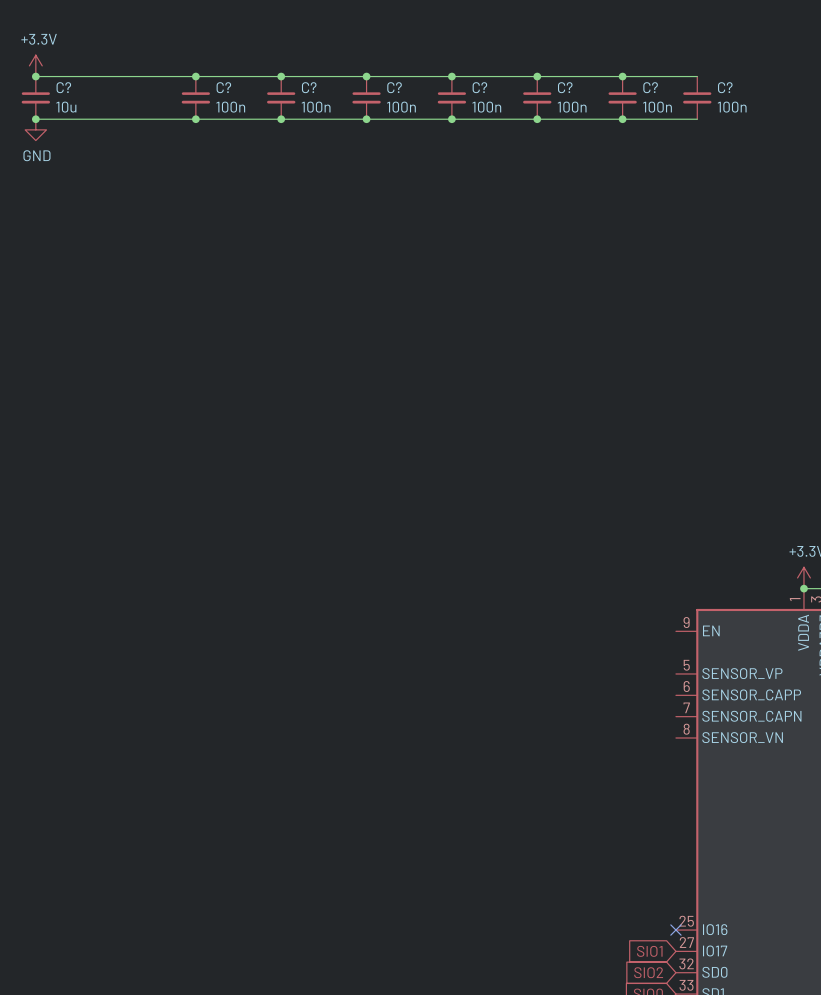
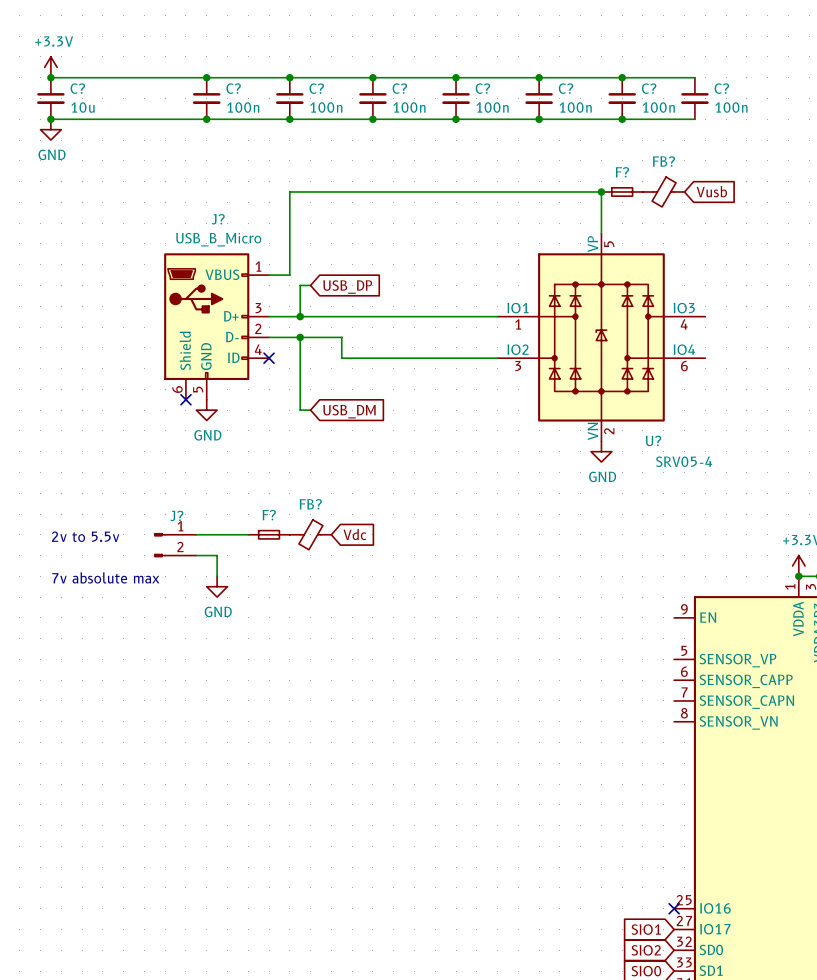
junction: none -> (601, 191)
F?: none -> (622, 191)
FB?: none -> (663, 191)
global label: none -> Vusb (711, 191)
wire: none -> (601, 233) (601, 191) (289, 191) (289, 275) (269, 275)
wire: none -> (310, 285) (300, 285) (300, 316)
global label: none -> USB_DP (347, 287)
wire: none -> (269, 316) (497, 316)
junction: none -> (300, 316)
J?: none -> USB_B_Micro (216, 326)
wire: none -> (269, 337) (341, 337) (341, 358) (497, 358)
wire: none -> (300, 337) (300, 410) (310, 410)
junction: none -> (300, 337)
U?: none -> SRV05-4 (601, 337)
no-connect mark: none -> (269, 358)
no-connect mark: none -> (185, 399)
power symbol: none -> GND (206, 410)
global label: none -> USB_DM (349, 411)
power symbol: none -> GND (601, 451)
wire: none -> (196, 534) (248, 534)
F?: none -> (269, 534)
FB?: none -> (310, 534)
global label: none -> Vdc (354, 534)
text: none -> 2v to 5.5v (85, 536)
J?: none -> (175, 545)
wire: none -> (196, 555) (217, 555) (217, 576)
text: none -> 7v absolute max (105, 577)
power symbol: none -> GND (217, 586)

